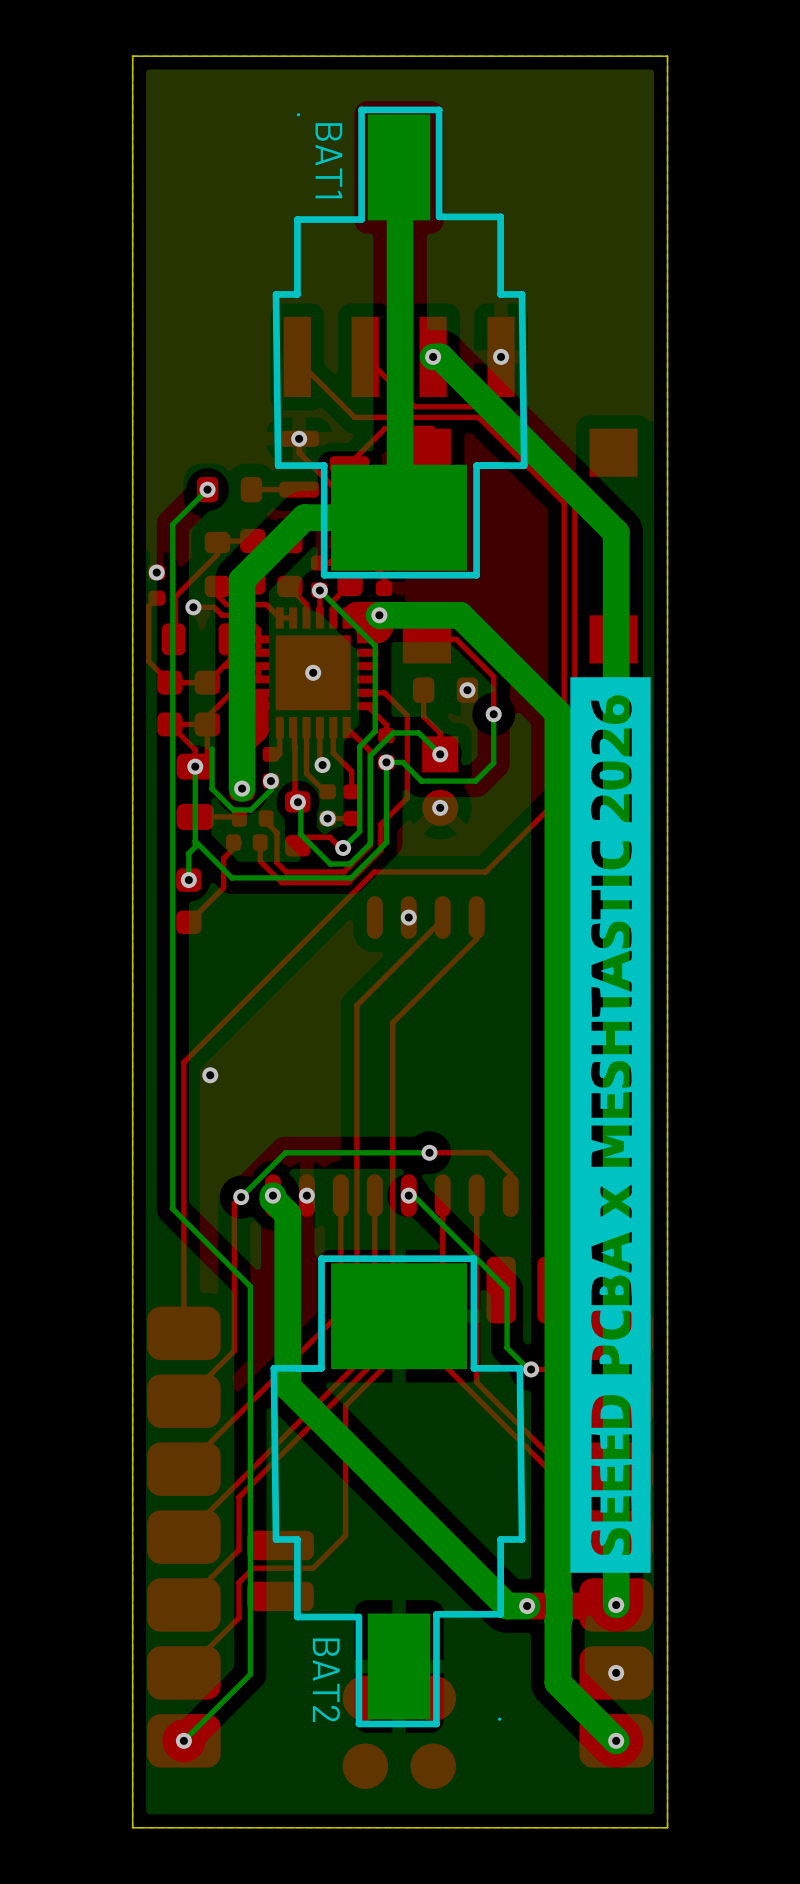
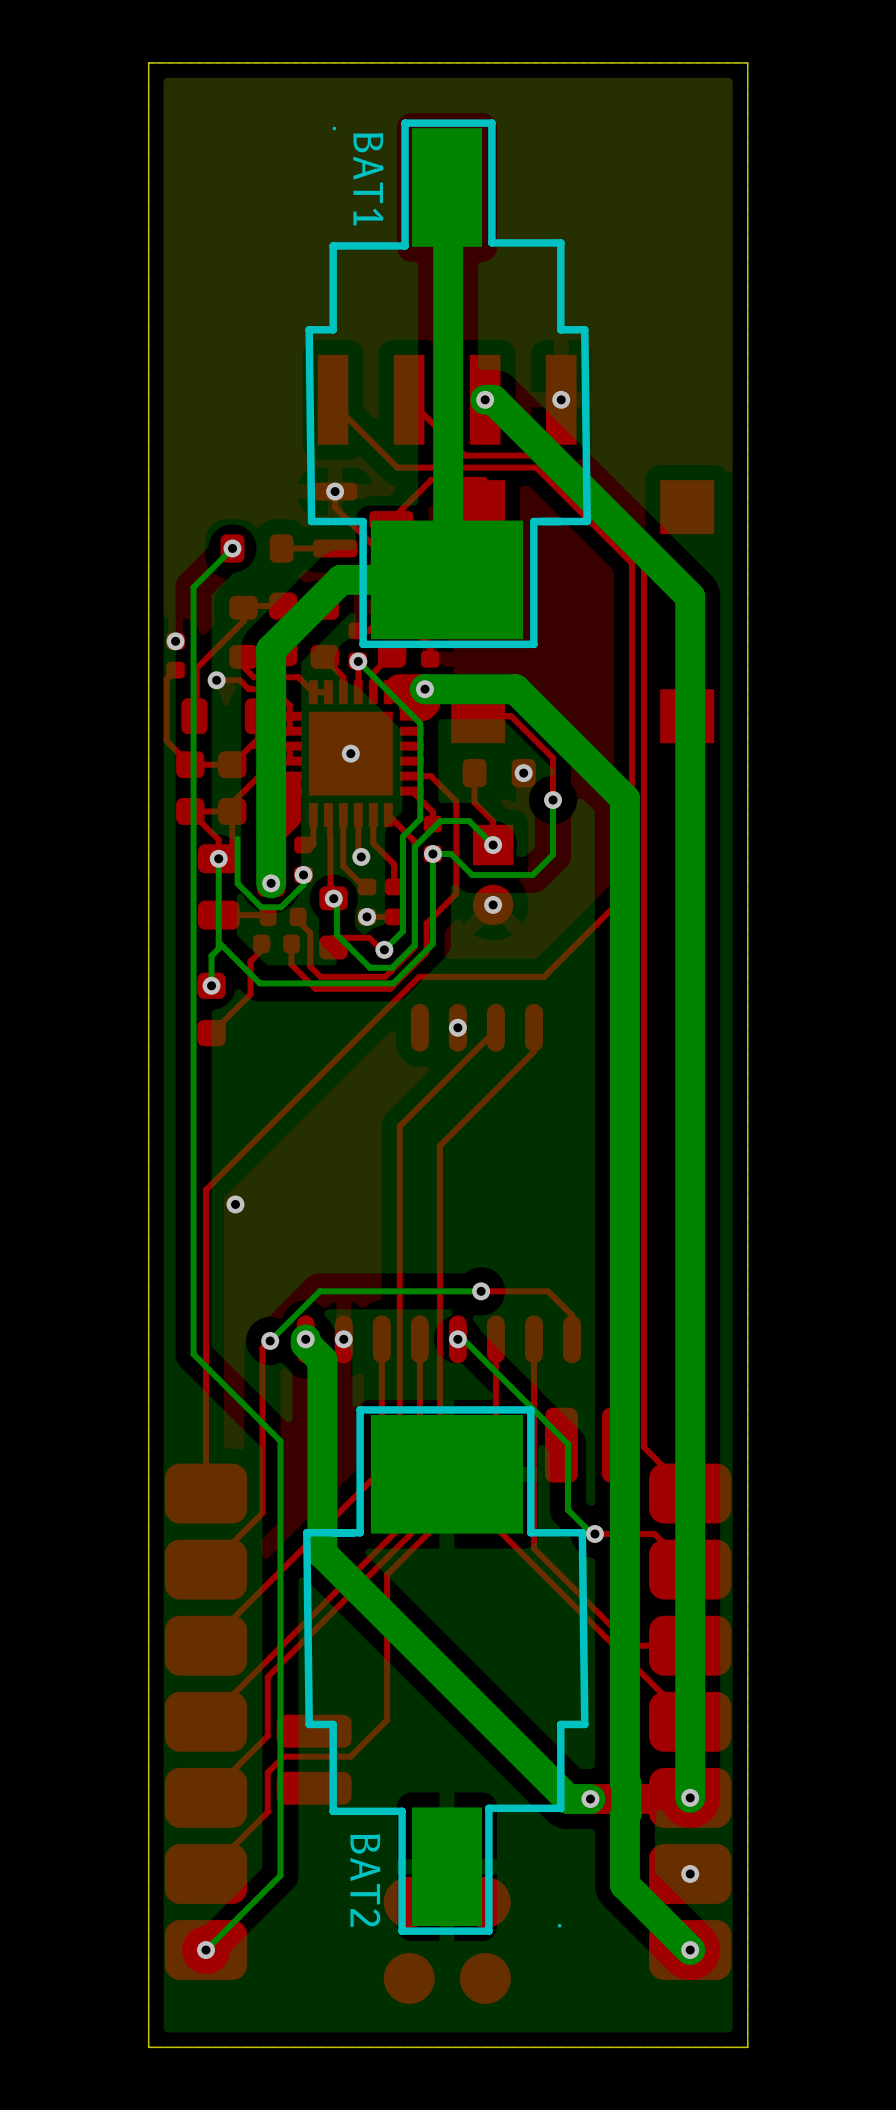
drawing: [570, 677, 651, 1573] -> none

